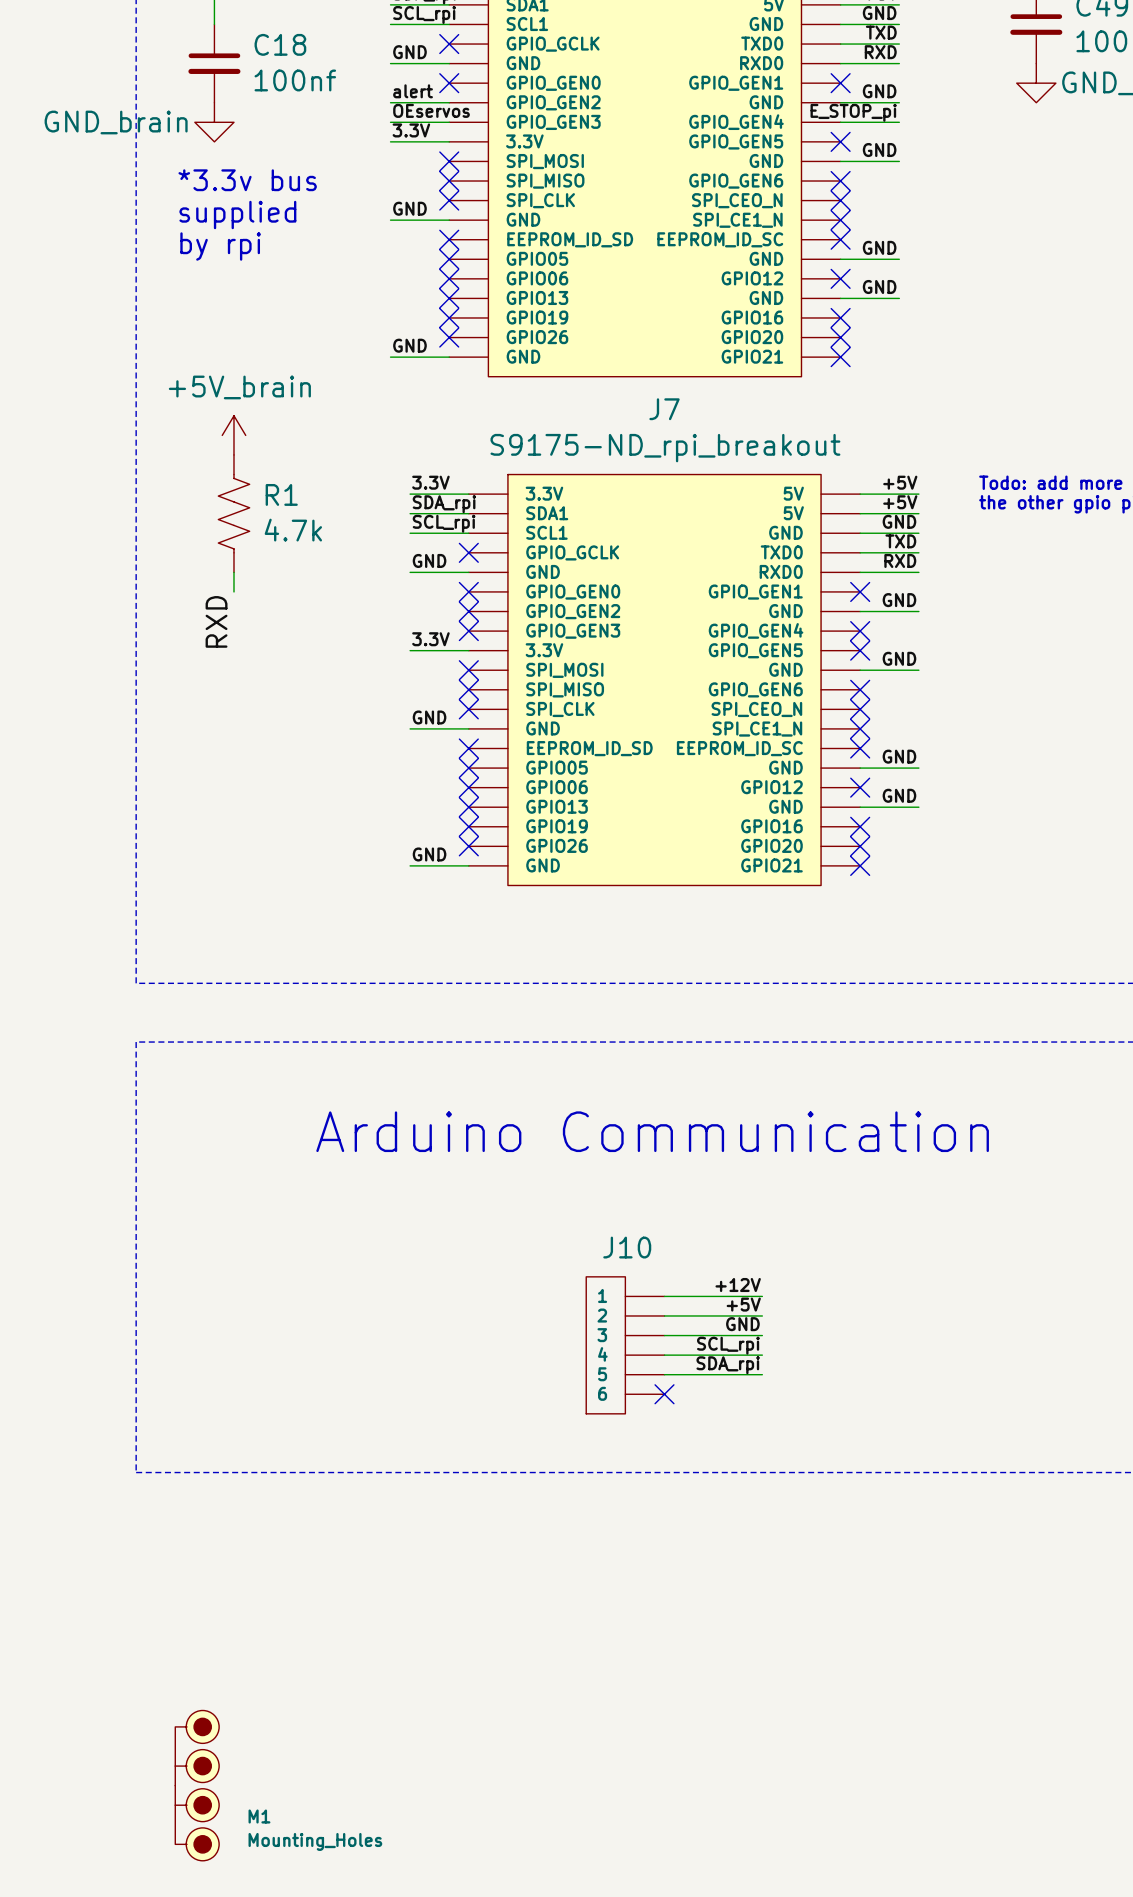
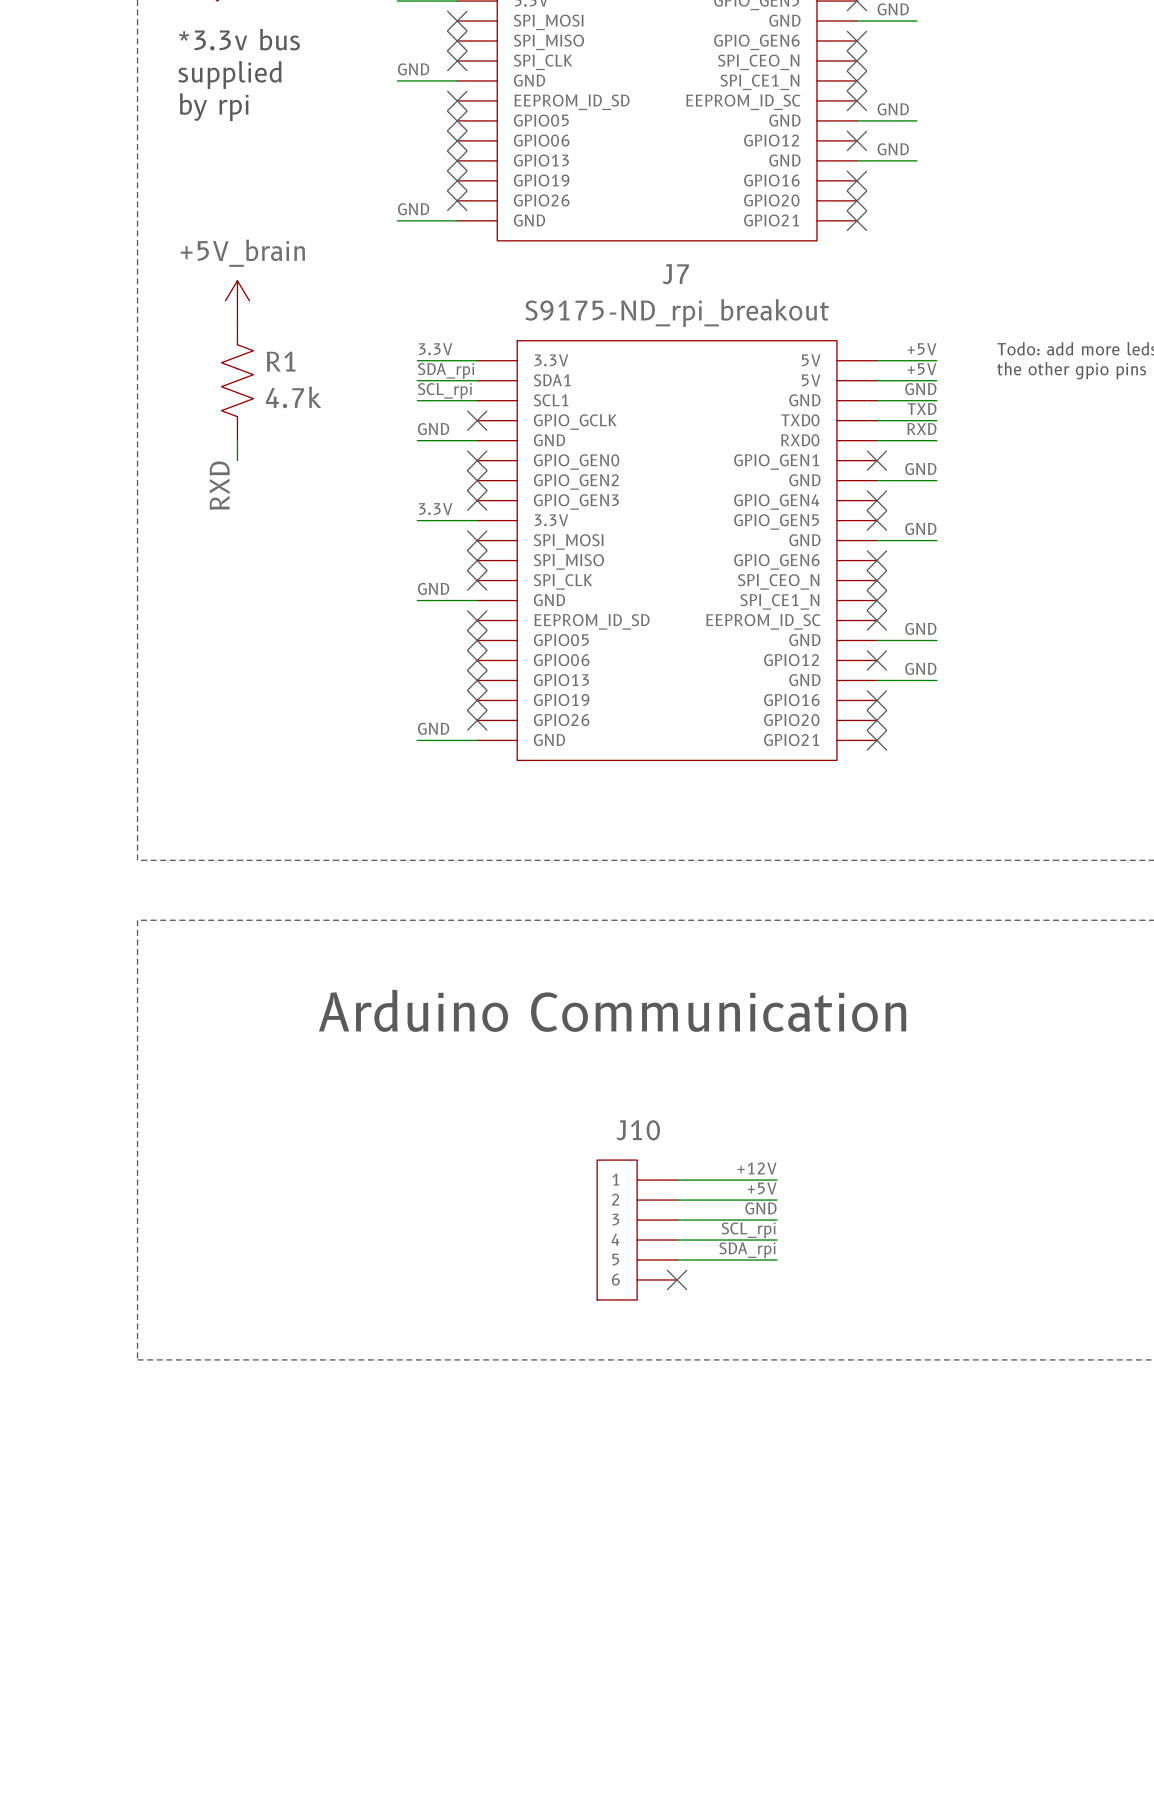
M1: Mounting_Holes (197, 1785) -> none

